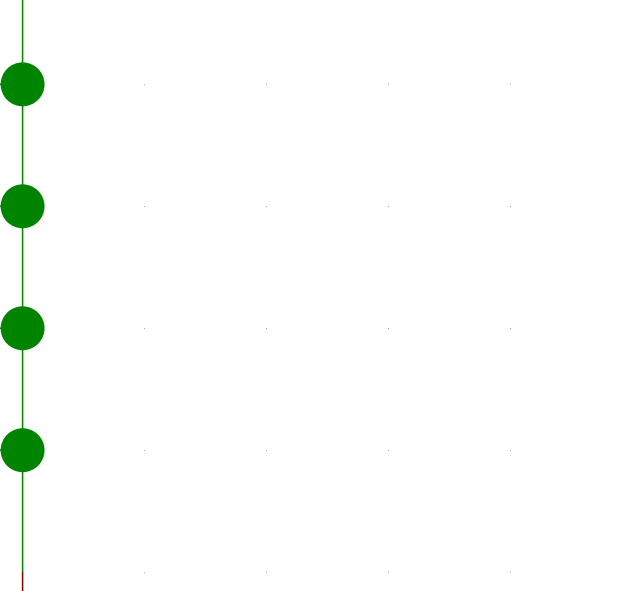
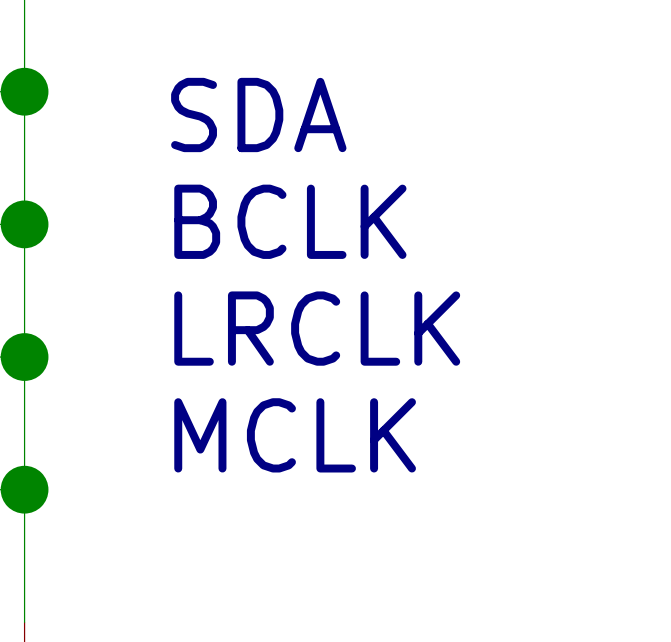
text: none -> SDA (258, 114)
text: none -> BCLK (290, 221)
text: none -> LRCLK (317, 328)
text: none -> MCLK (295, 435)

